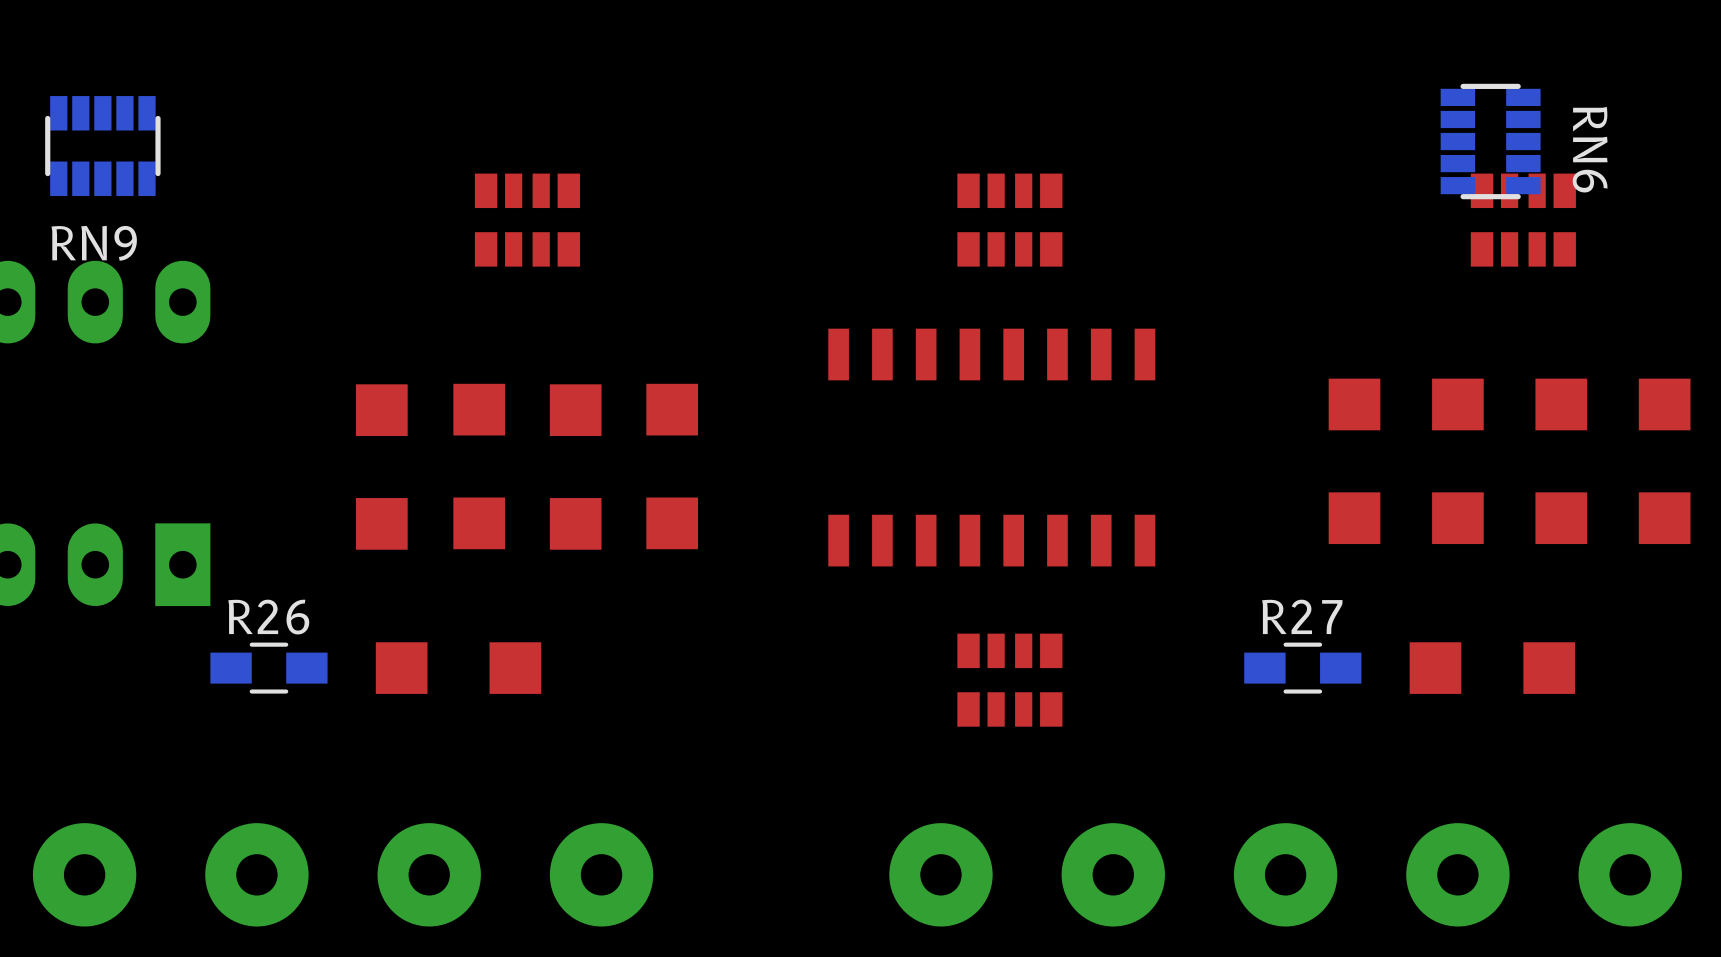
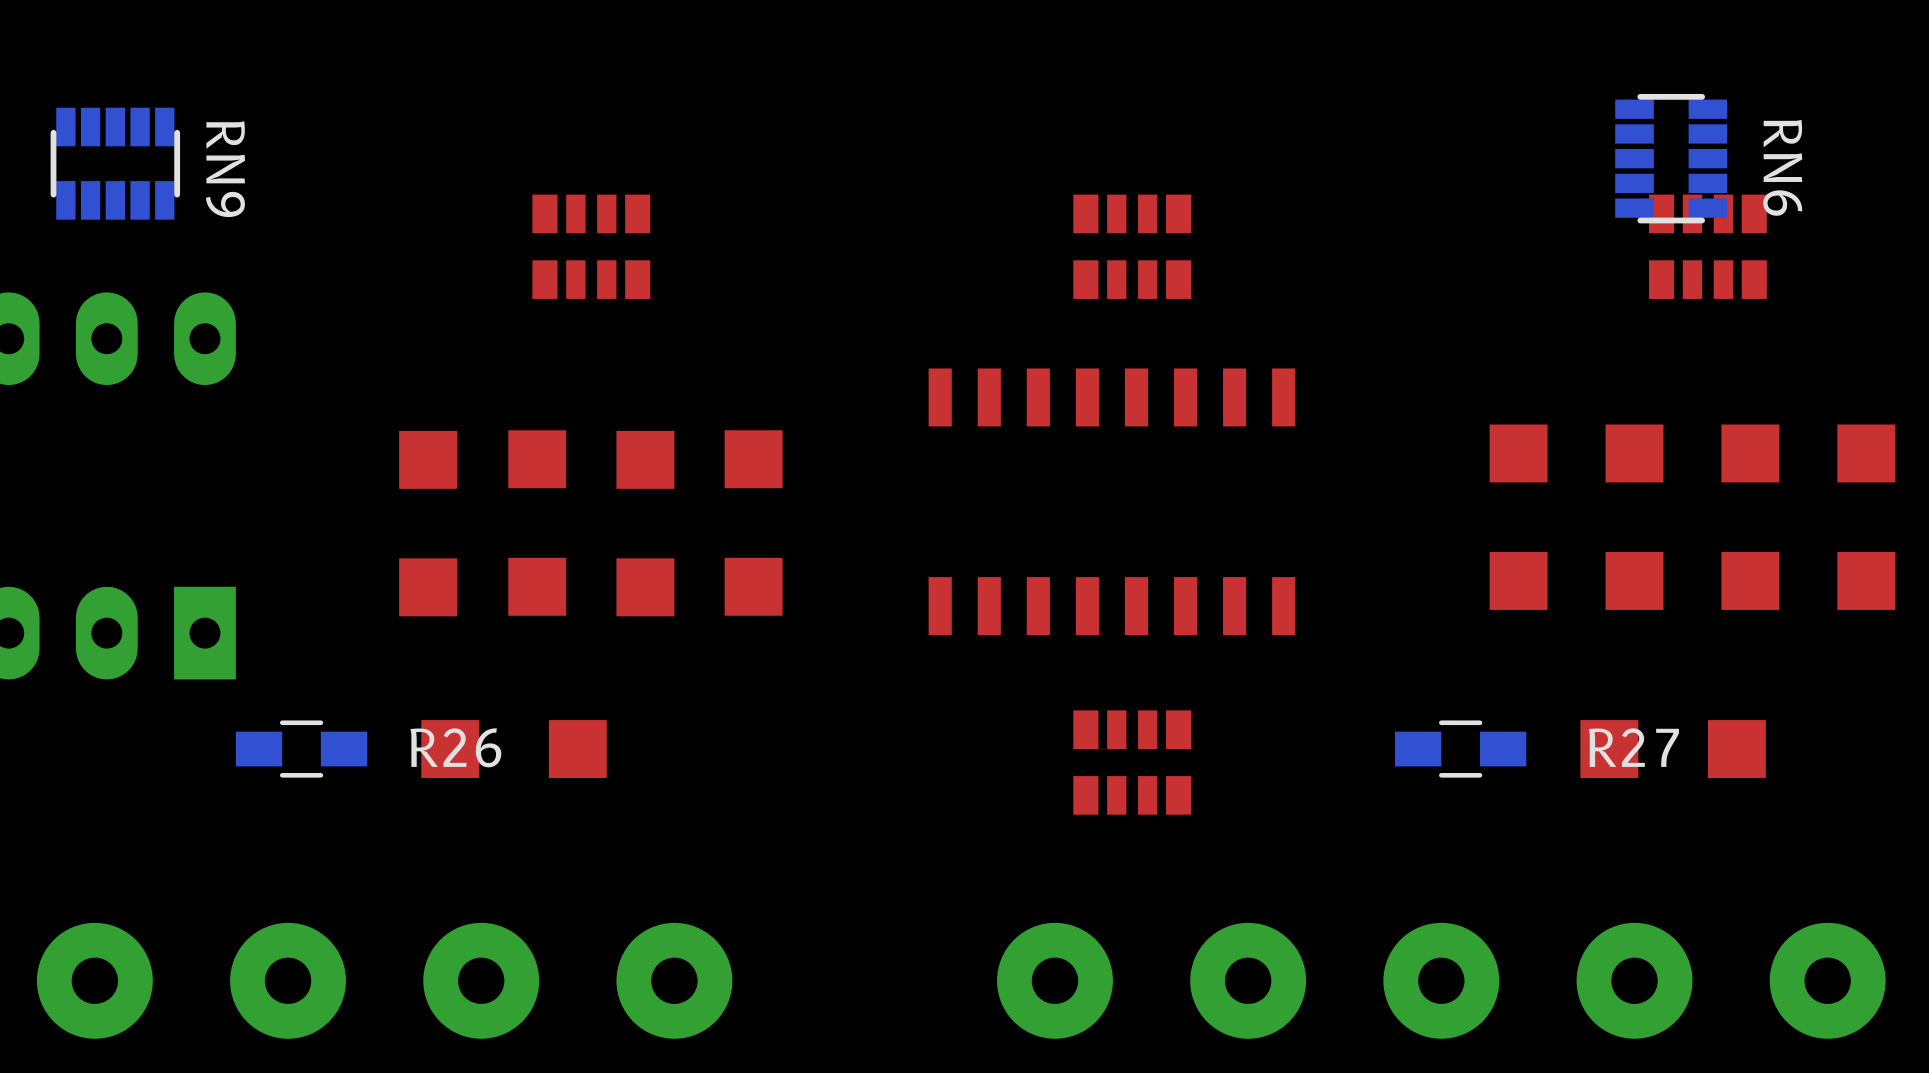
RN9 name rotation: 0° (94, 243) -> 90° clockwise (225, 169)
RN9 name position: RN9 (94, 243) -> RN9 (225, 169)
R27 name position: R27 (1302, 616) -> R27 (1633, 747)
R26 name position: R26 (268, 617) -> R26 (455, 747)

